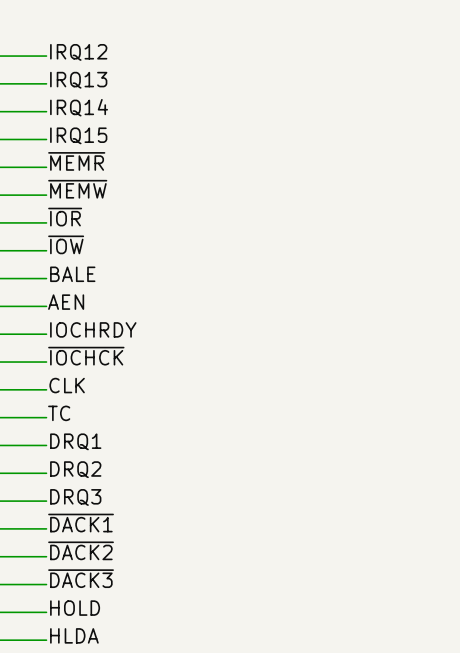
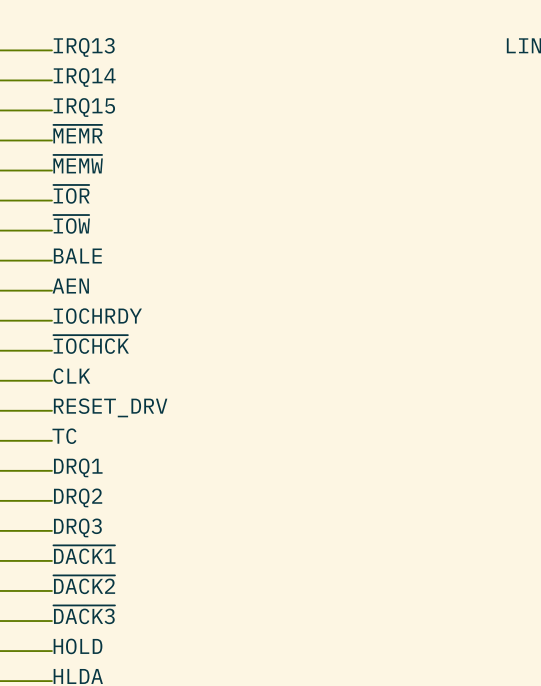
label: IRQ12 (78, 52) -> IRQ13 (84, 47)
label: IRQ13 (78, 80) -> IRQ14 (84, 77)
label: IRQ14 (79, 107) -> IRQ15 (84, 107)
label: IRQ15 (78, 135) -> ~{MEMR} (77, 134)
label: ~{MEMR} (76, 161) -> ~{MEMW} (78, 164)
label: ~{MEMW} (77, 189) -> ~{IOR} (71, 194)
label: ~{IOR} (65, 217) -> ~{IOW} (71, 224)
label: ~{IOW} (66, 244) -> BALE (77, 256)
label: BALE (72, 274) -> AEN (70, 286)
label: AEN (66, 302) -> IOCHRDY (97, 316)
label: IOCHRDY (93, 329) -> ~{IOCHCK} (91, 344)
label: ~{IOCHCK} (86, 356) -> CLK (71, 376)
label: CLK (67, 385) -> RESET_DRV (110, 407)

